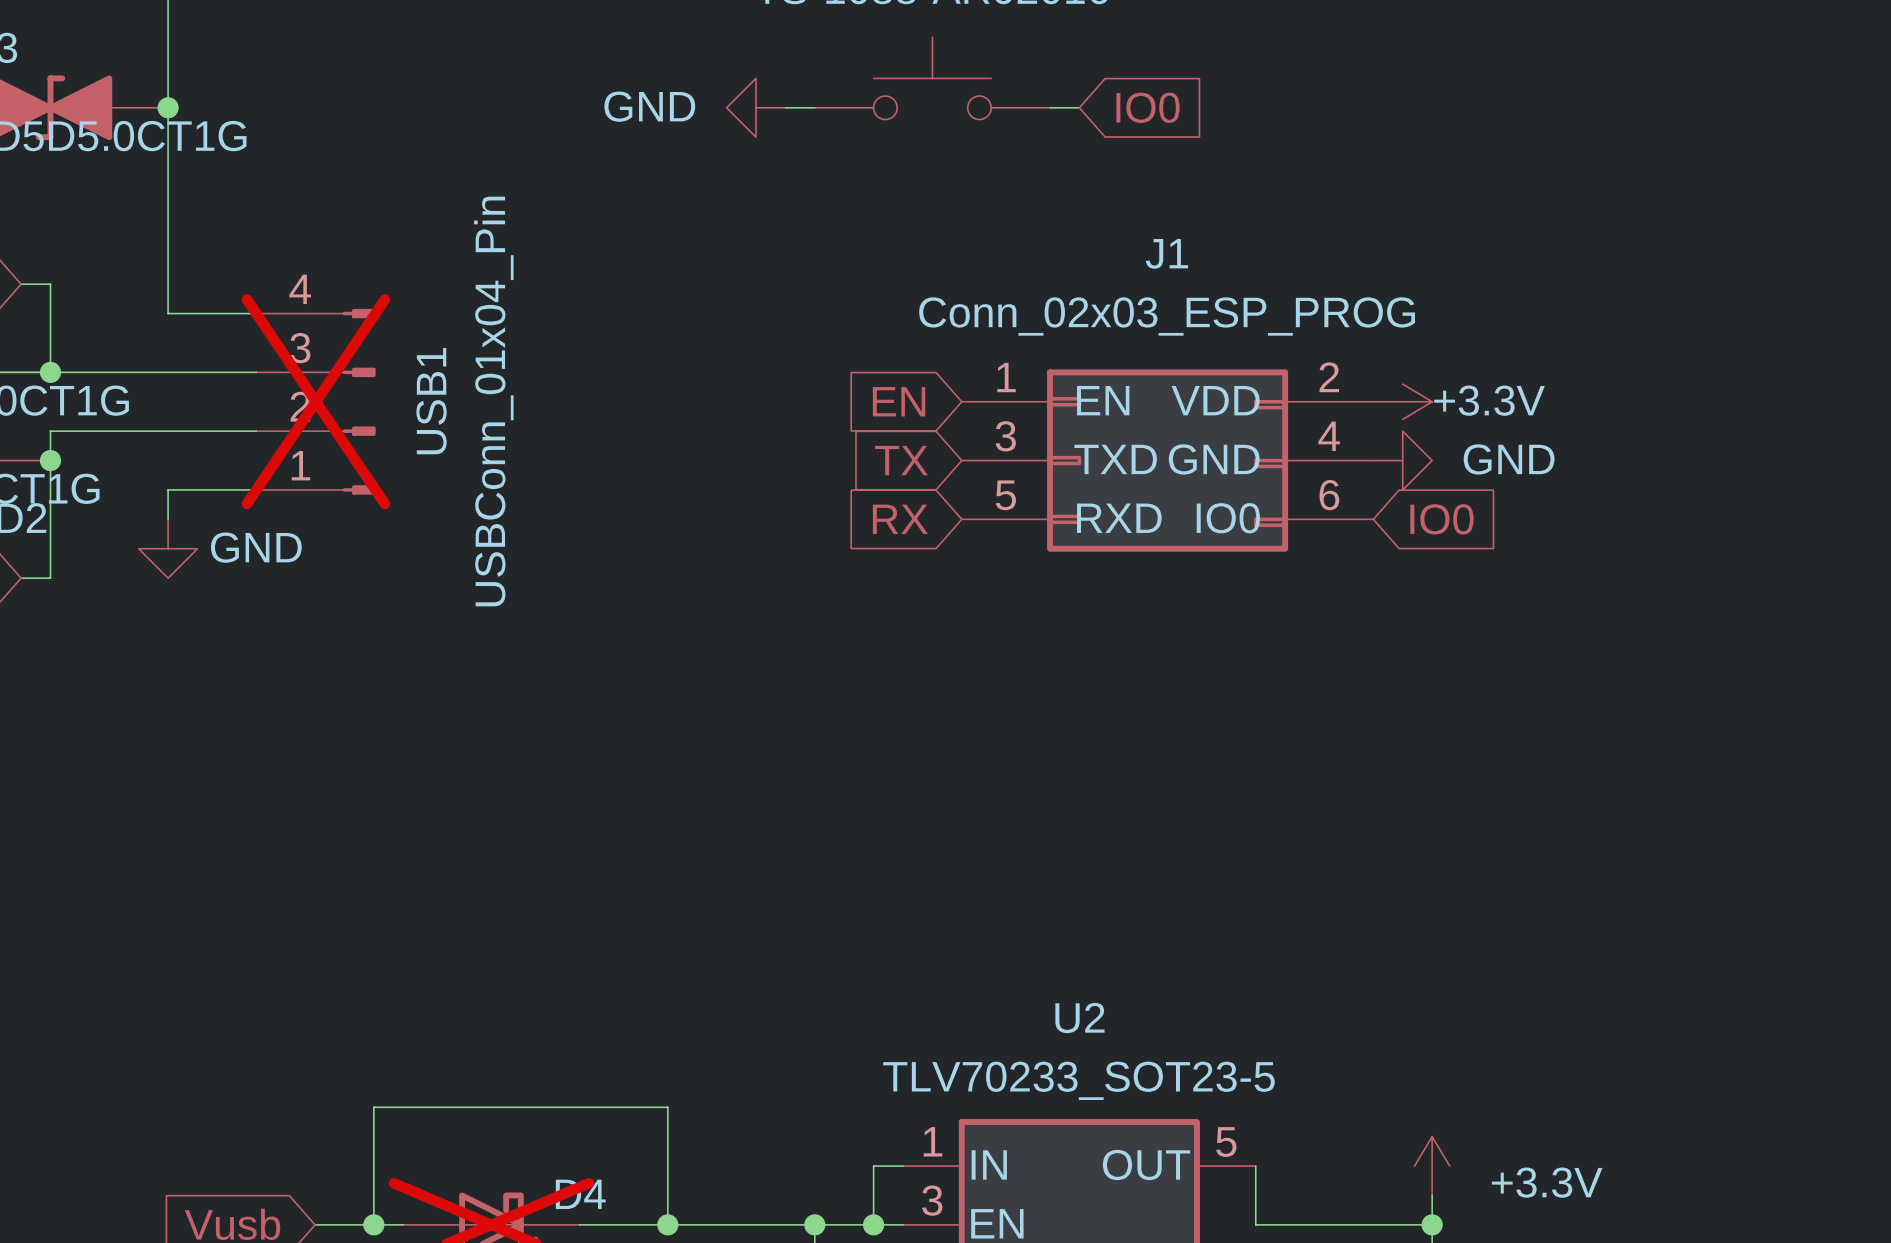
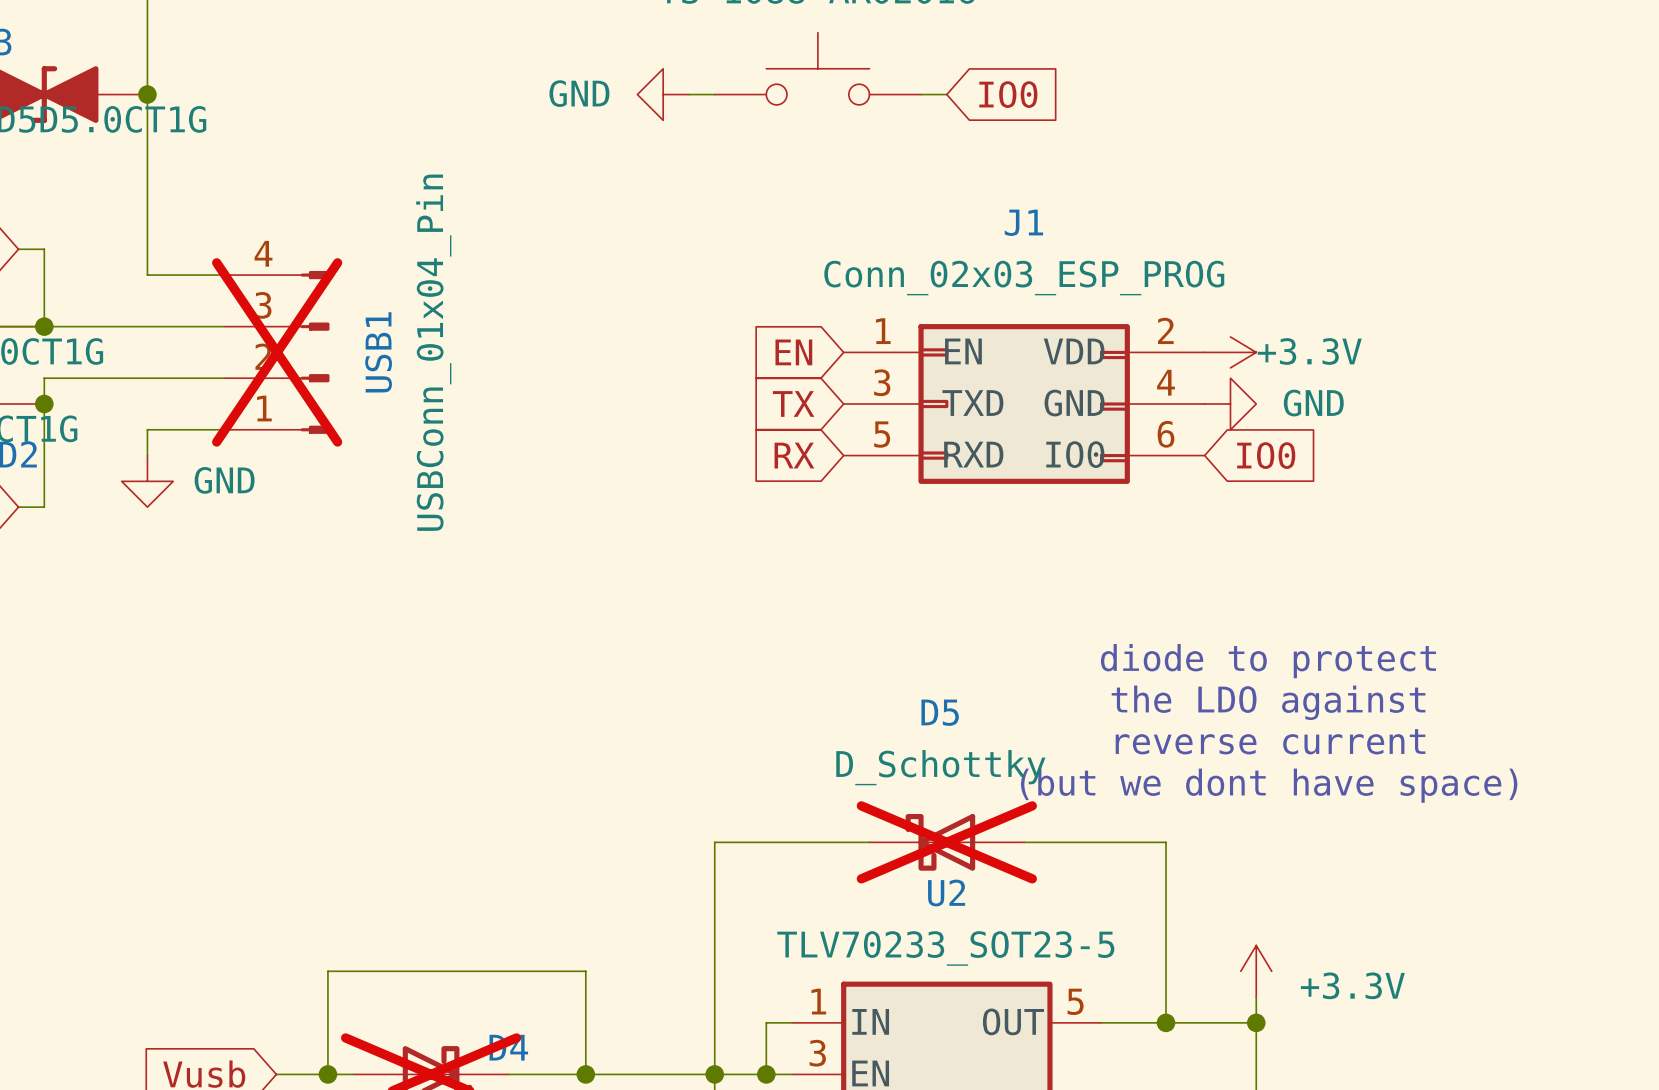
text: none -> diode to protect (1268, 661)
text: none -> the LDO against (1268, 702)
text: none -> reverse current (1270, 741)
text: none -> (but we dont have space) (1269, 785)
wire: none -> (869, 842) (714, 842) (714, 1074)
D5: none -> D_Schottky (946, 842)
wire: none -> (1024, 842) (1166, 842) (1166, 1022)
wire: (1255, 1166) (1255, 1224) (1432, 1224) -> (1101, 1022) (1256, 1022)
junction: none -> (1166, 1022)
power symbol position: +3.3V (1432, 1166) -> +3.3V (1256, 971)
junction position: (1432, 1224) -> (1256, 1022)

